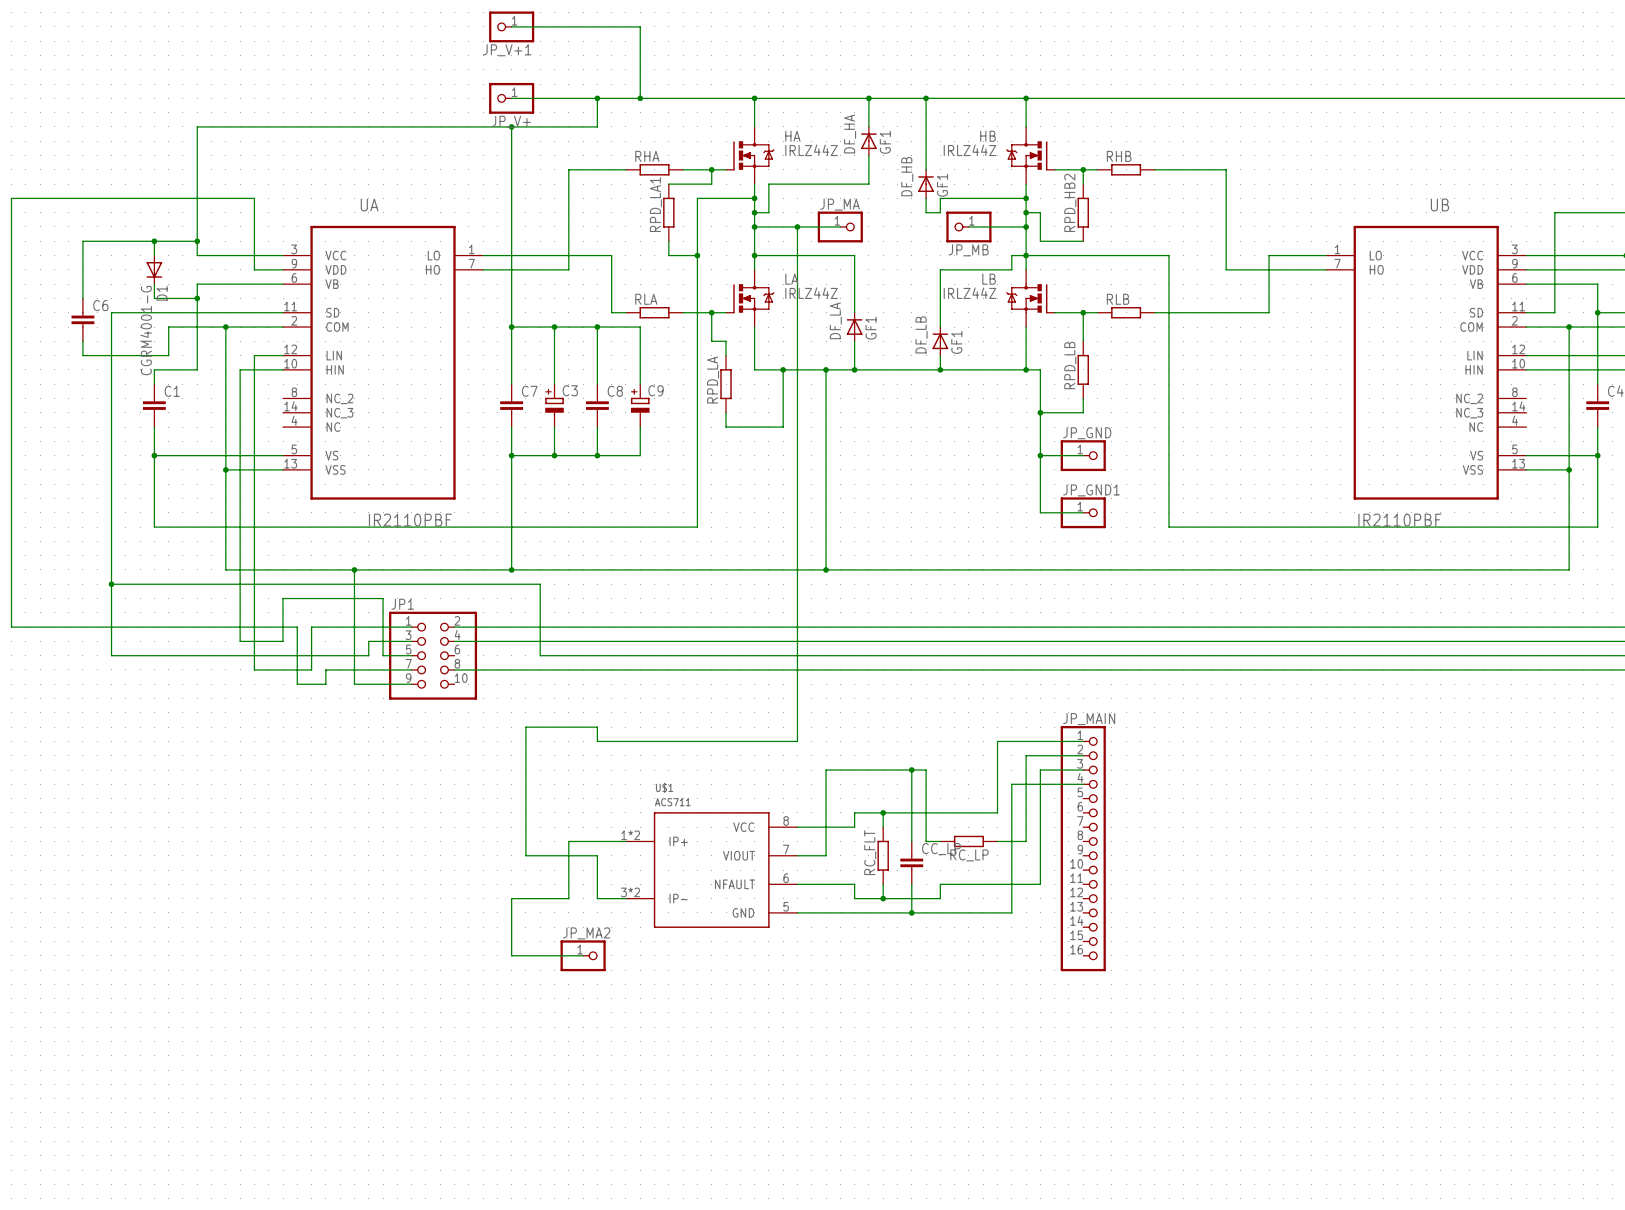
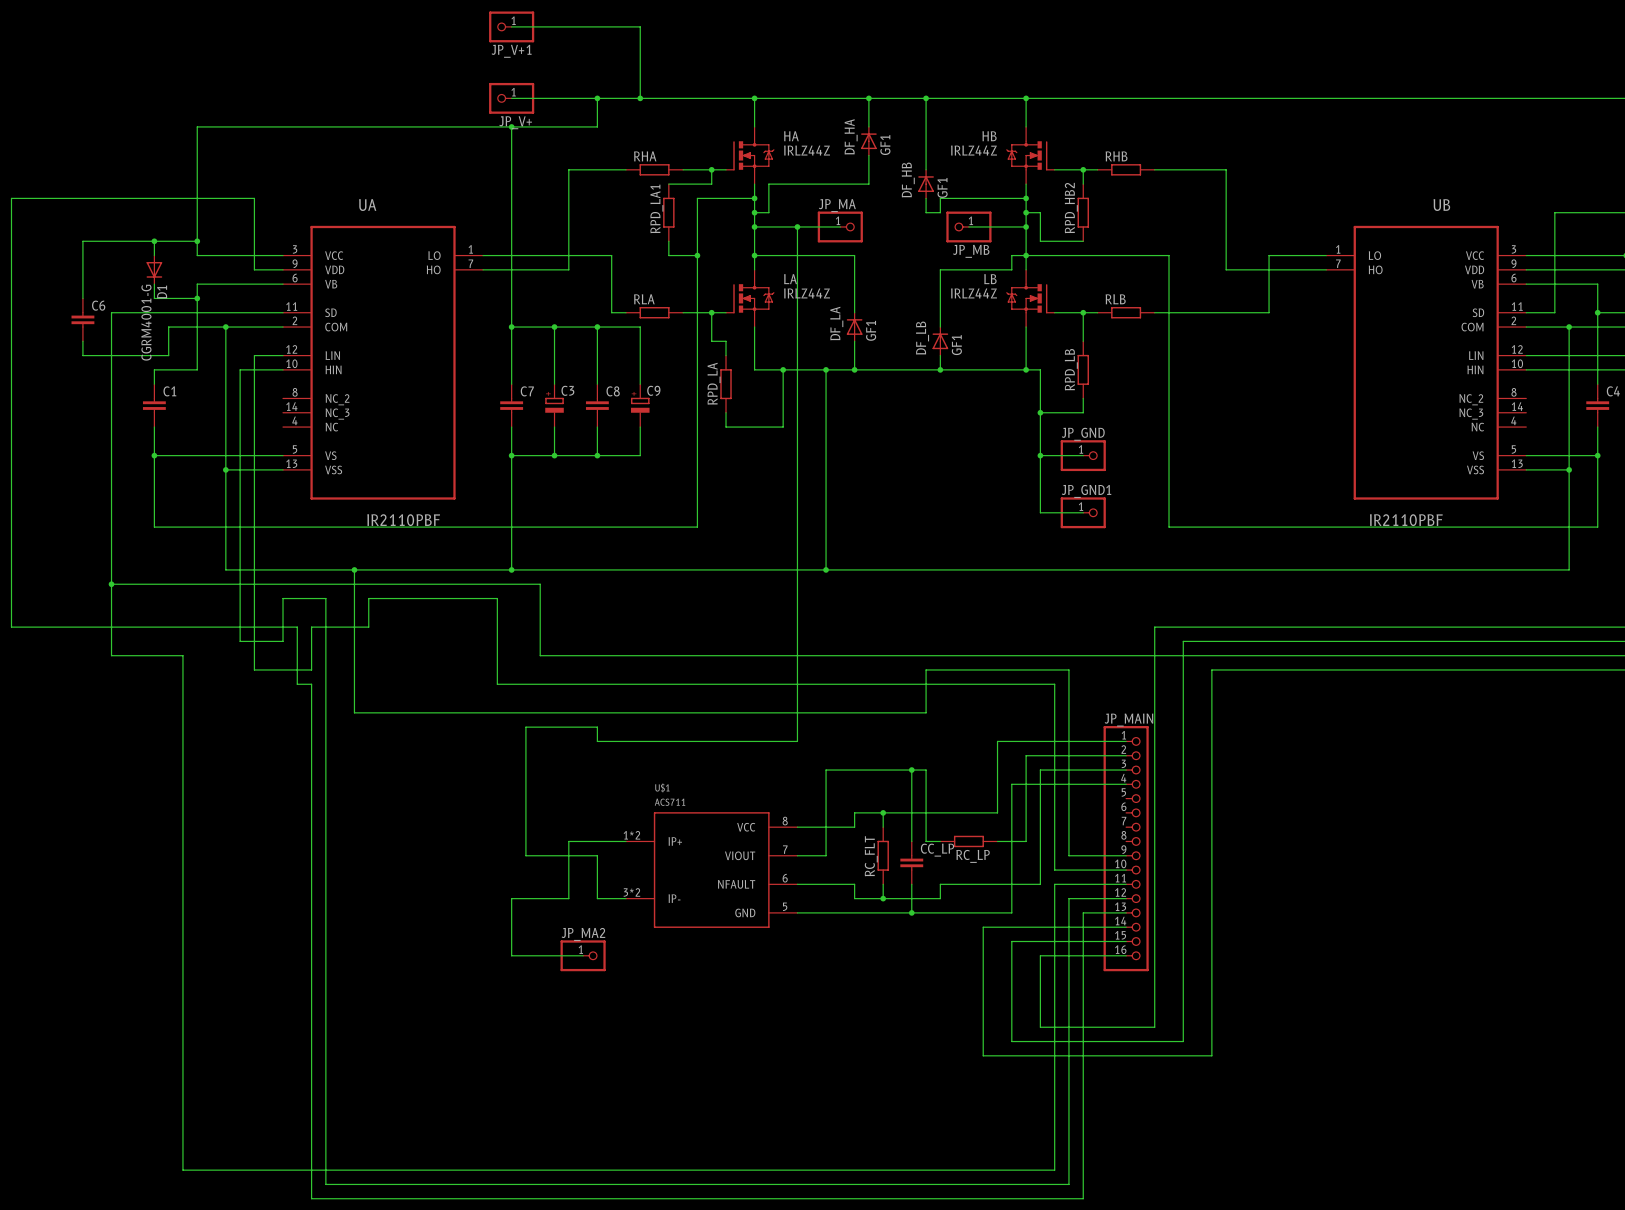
wire: (325, 598) (368, 598) -> (368, 627) (368, 598)
wire: (383, 598) (383, 655) (411, 655) -> (383, 598) (497, 598) (497, 684) (1054, 684) (1054, 870) (1126, 870)
wire: (368, 627) (411, 627) -> none
wire: (454, 627) (1154, 627) -> (1126, 955) (1040, 955) (1040, 1027) (1154, 1027) (1154, 627)
wire: (411, 641) (368, 641) (368, 655) (182, 655) -> (1126, 884) (1054, 884) (1054, 1170) (182, 1170) (182, 655)
wire: (454, 641) (1183, 641) -> (1126, 941) (1011, 941) (1011, 1041) (1183, 1041) (1183, 641)
JP1: (433, 655) -> none
wire: (325, 669) (411, 669) -> (325, 669) (325, 598)
wire: (454, 669) (926, 669) -> (354, 684) (354, 712) (926, 712) (926, 669)
wire: (1068, 669) (1211, 669) -> (1068, 669) (1068, 855) (1126, 855)
wire: none -> (1211, 669) (1211, 1055) (983, 1055) (983, 927) (1126, 927)
wire: (311, 684) (325, 684) -> (311, 684) (311, 1198) (1083, 1198) (1083, 912) (1126, 912)
wire: none -> (325, 684) (325, 1184) (1068, 1184) (1068, 898) (1126, 898)
wire: (354, 684) (411, 684) -> none
wire: none -> (1083, 741) (1126, 741)
wire: none -> (1083, 755) (1126, 755)
wire: none -> (1083, 770) (1126, 770)
wire: none -> (1083, 784) (1126, 784)
JP_MAIN position: (1083, 848) -> (1126, 848)

